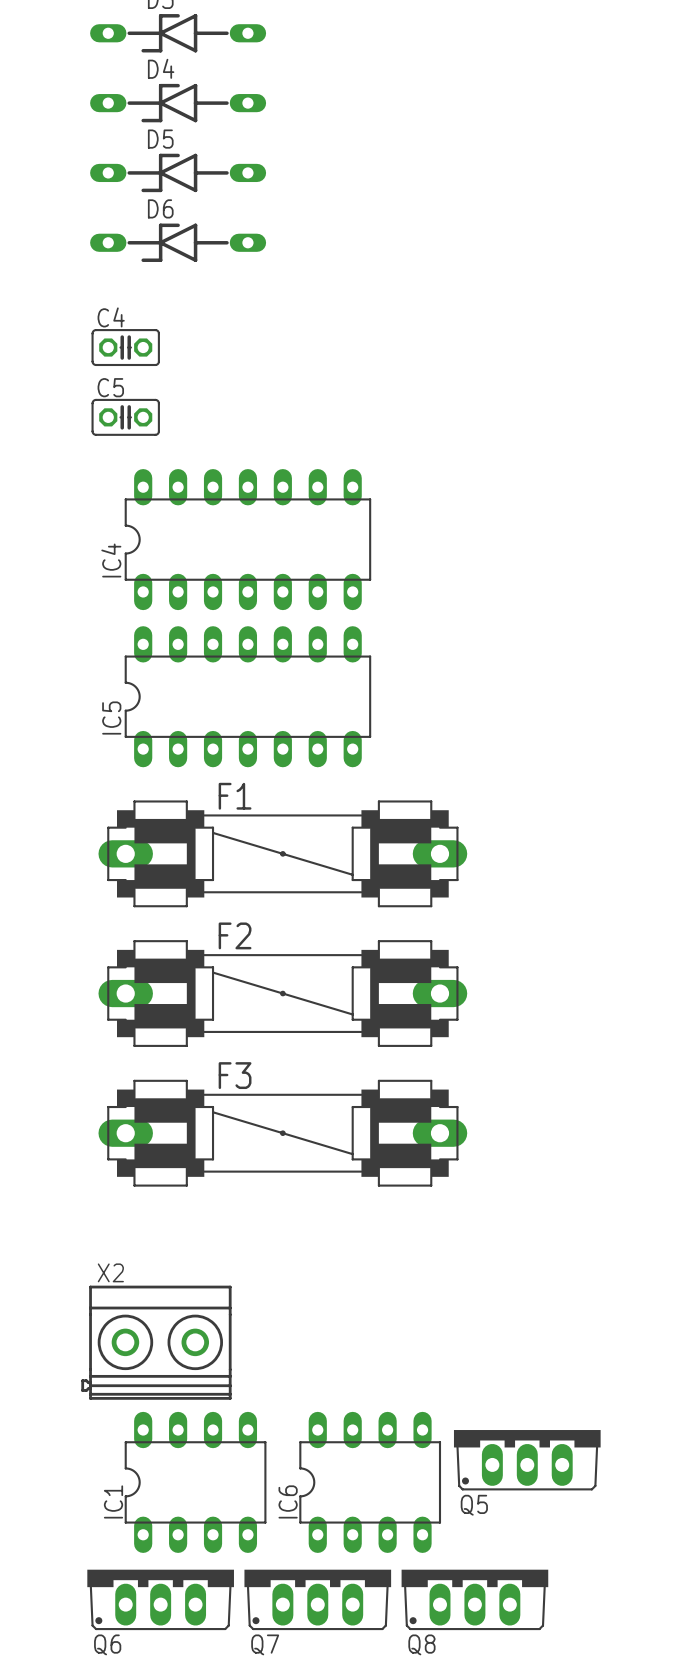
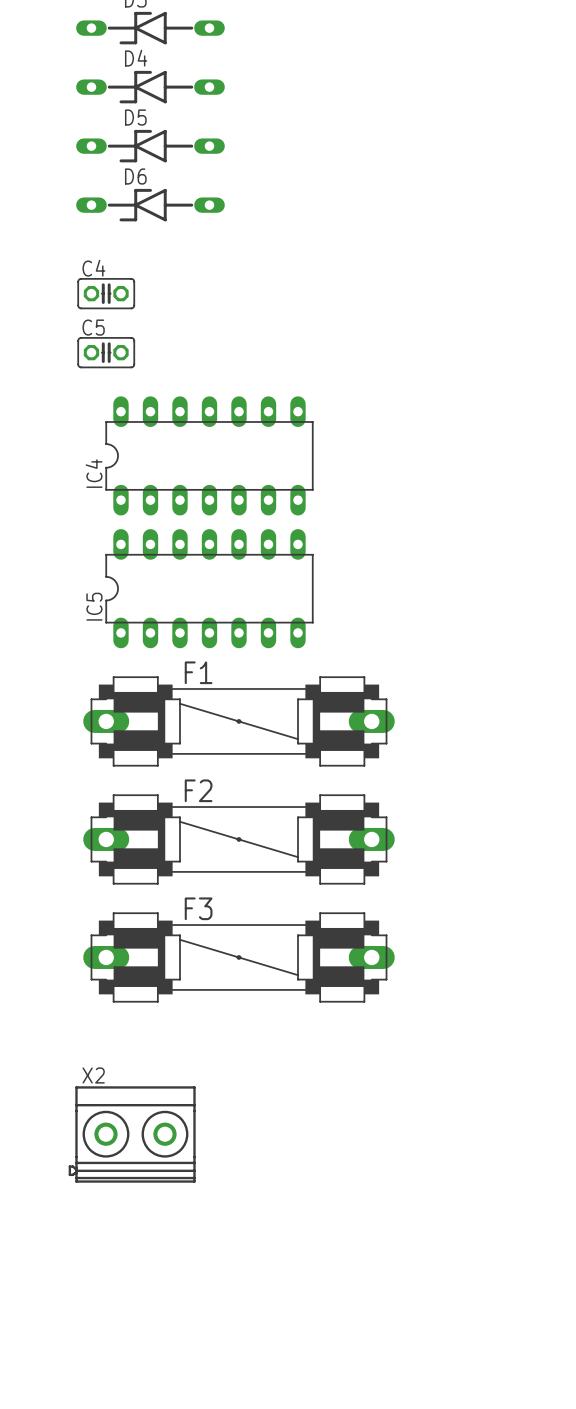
Q5: (527, 1460) -> none
IC1: (195, 1482) -> none
IC6: (370, 1482) -> none
Q6: (160, 1599) -> none
Q7: (317, 1599) -> none
Q8: (474, 1599) -> none

